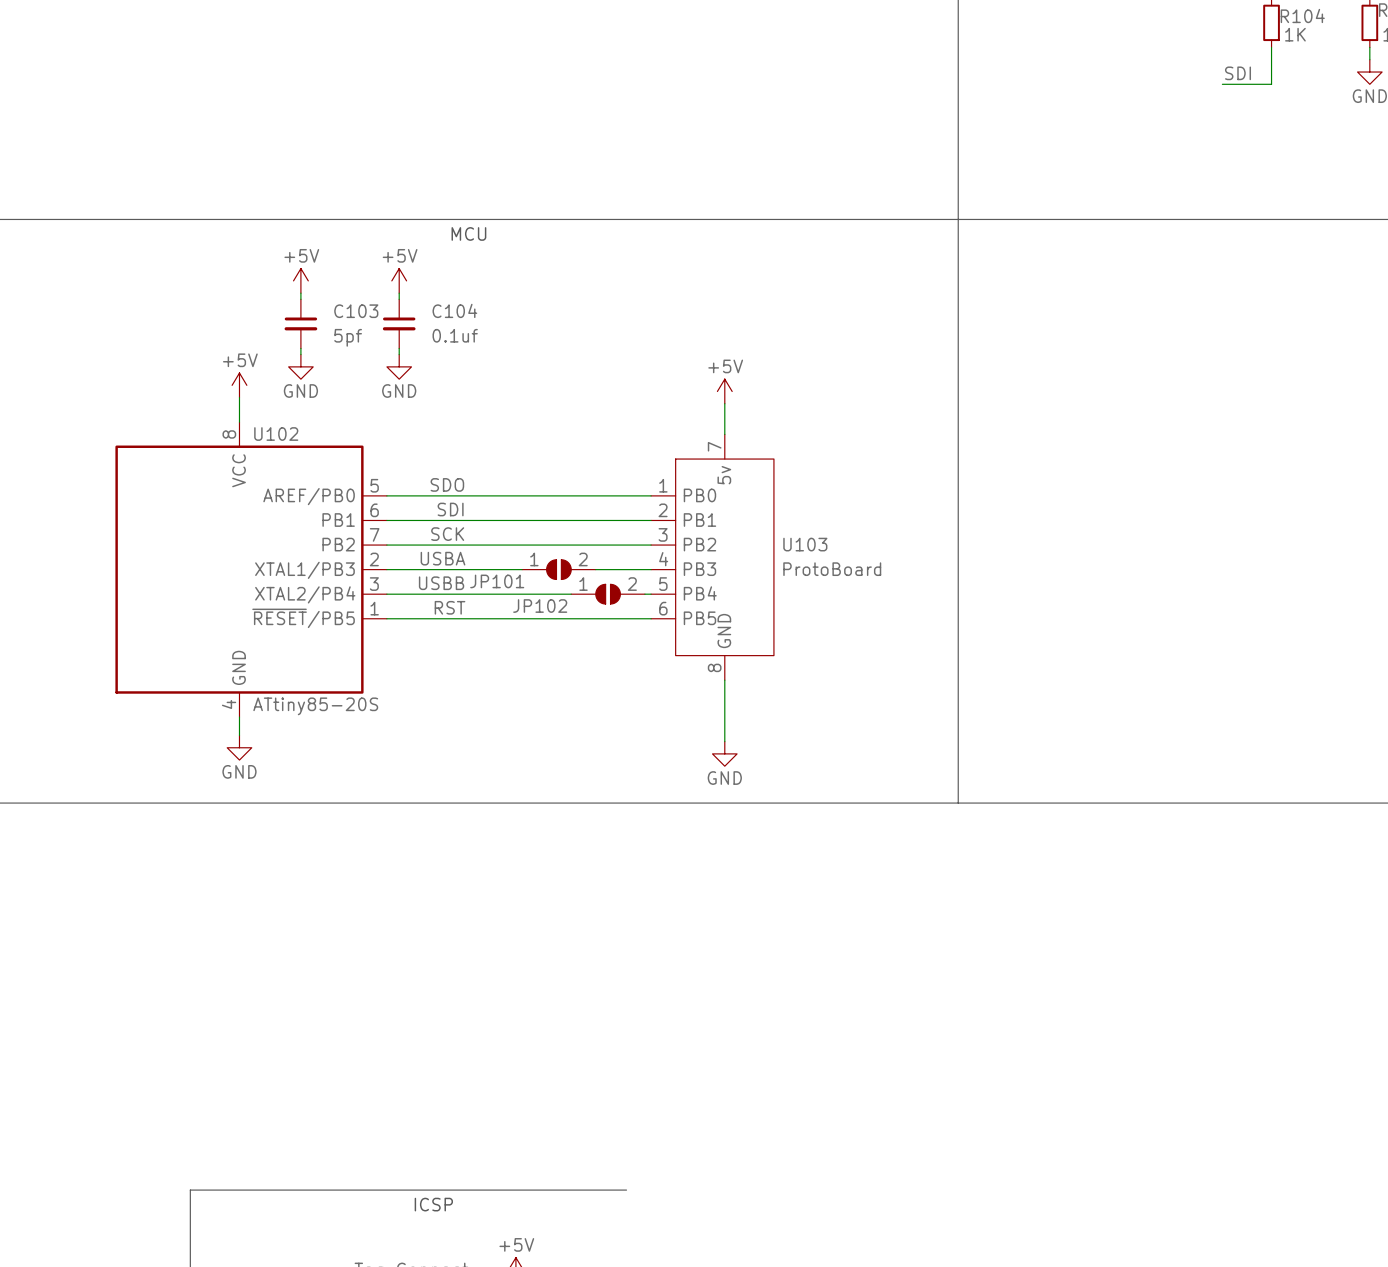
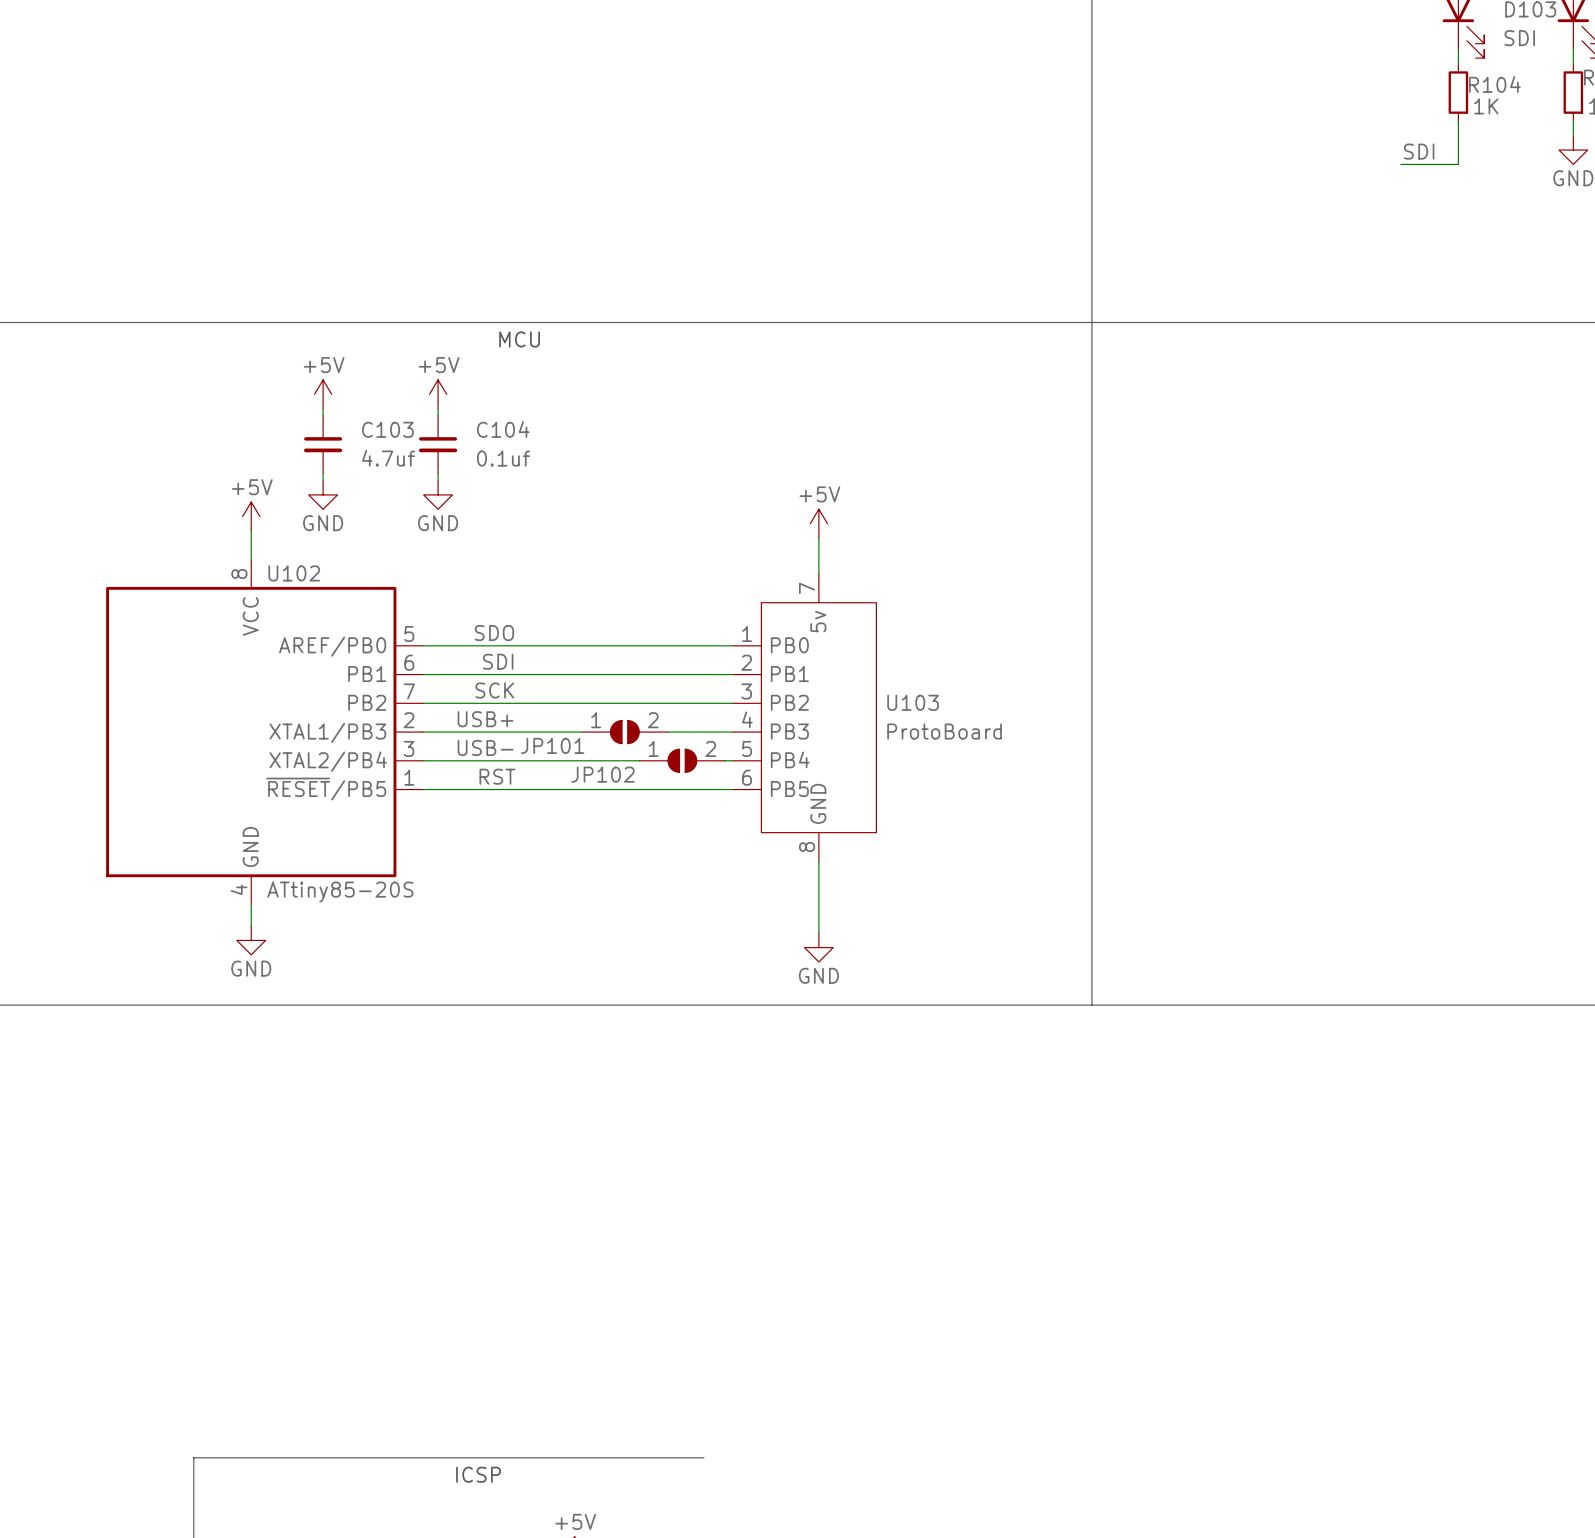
C103 value: 5pf (348, 337) -> 4.7uf (388, 458)
label: USBA (442, 558) -> USB+ (485, 719)
label: USBB (441, 583) -> USB- (485, 747)

